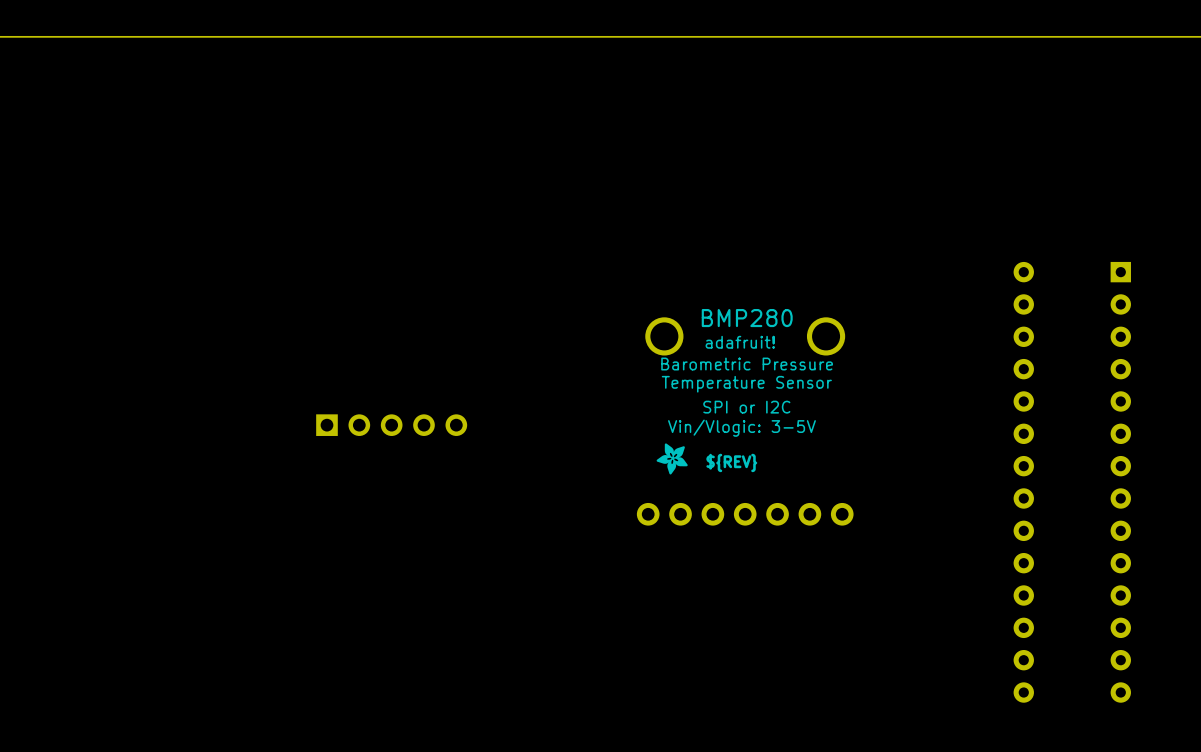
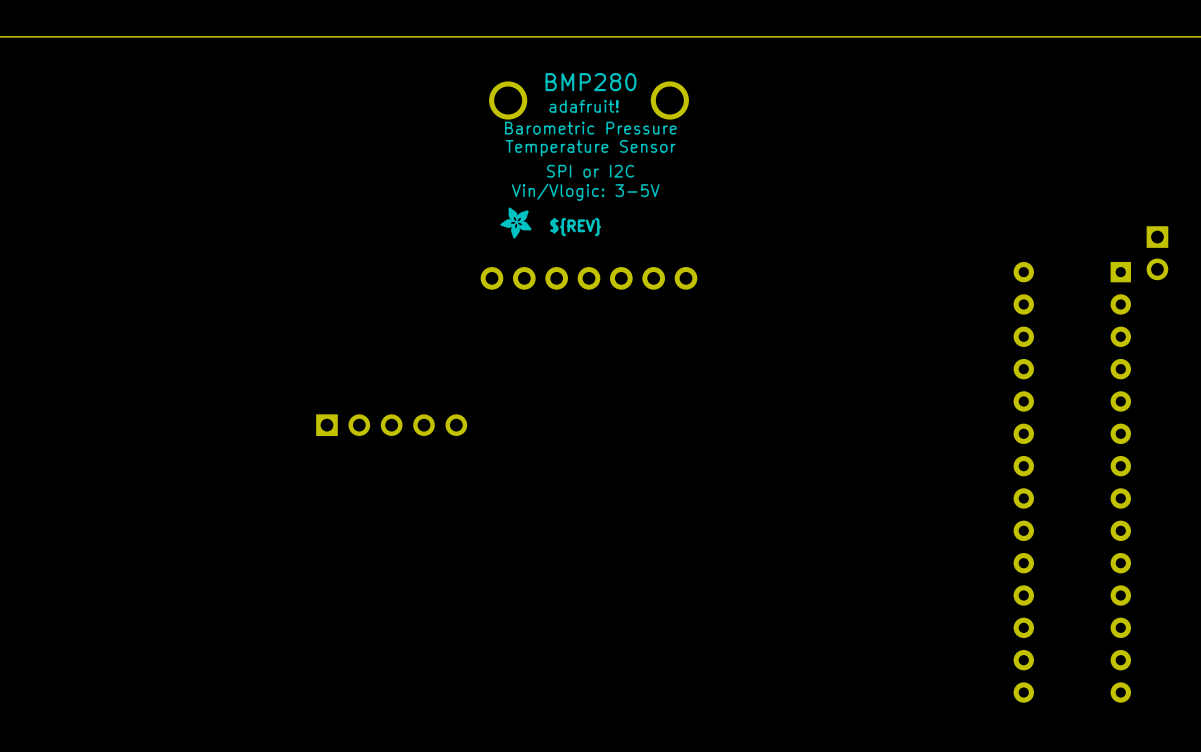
part: none -> (1157, 253)
part position: (745, 421) -> (589, 185)

